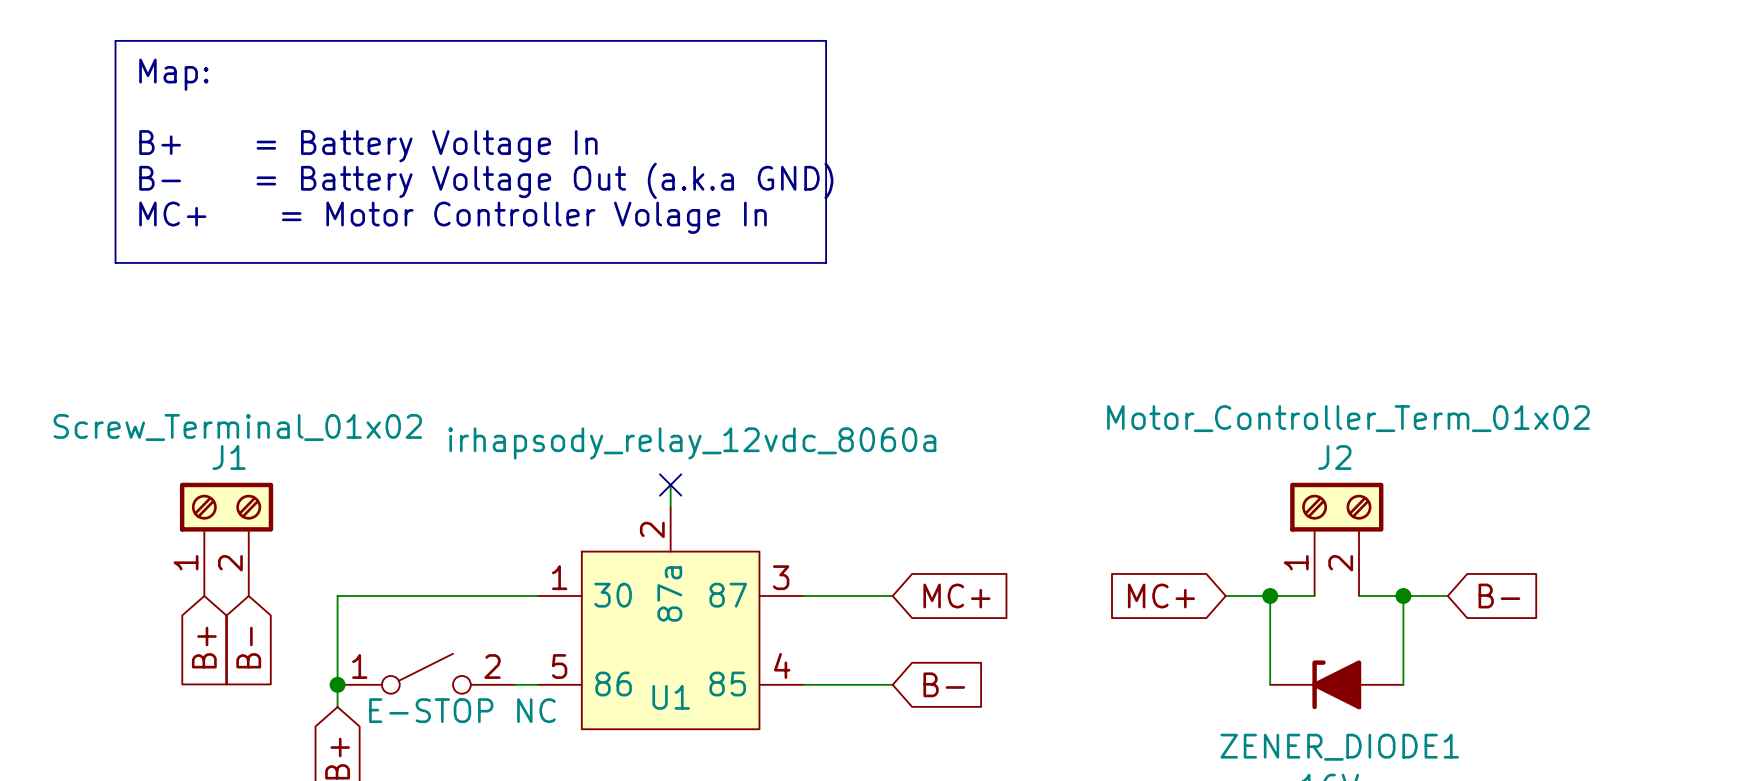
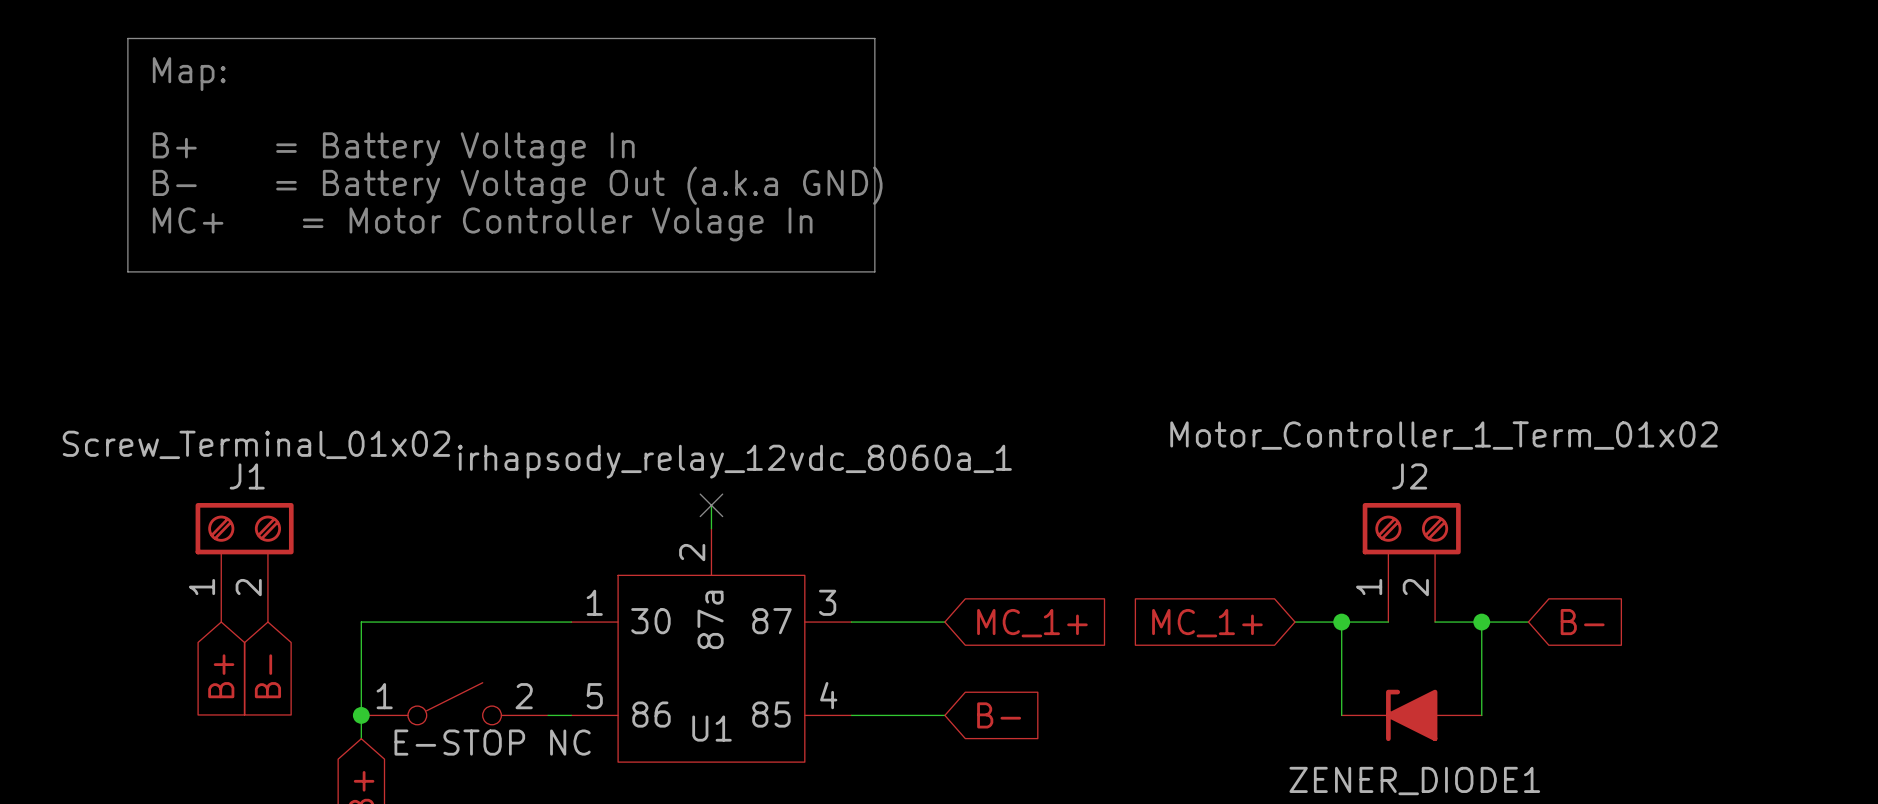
J2 value: Motor_Controller_Term_01x02 (1348, 418) -> Motor_Controller_1_Term_01x02 (1444, 435)
U1 value: irhapsody_relay_12vdc_8060a (692, 443) -> irhapsody_relay_12vdc_8060a_1 (734, 461)
global label: MC+ (956, 596) -> MC_1+ (1032, 623)
global label: MC+ (1161, 596) -> MC_1+ (1207, 623)

